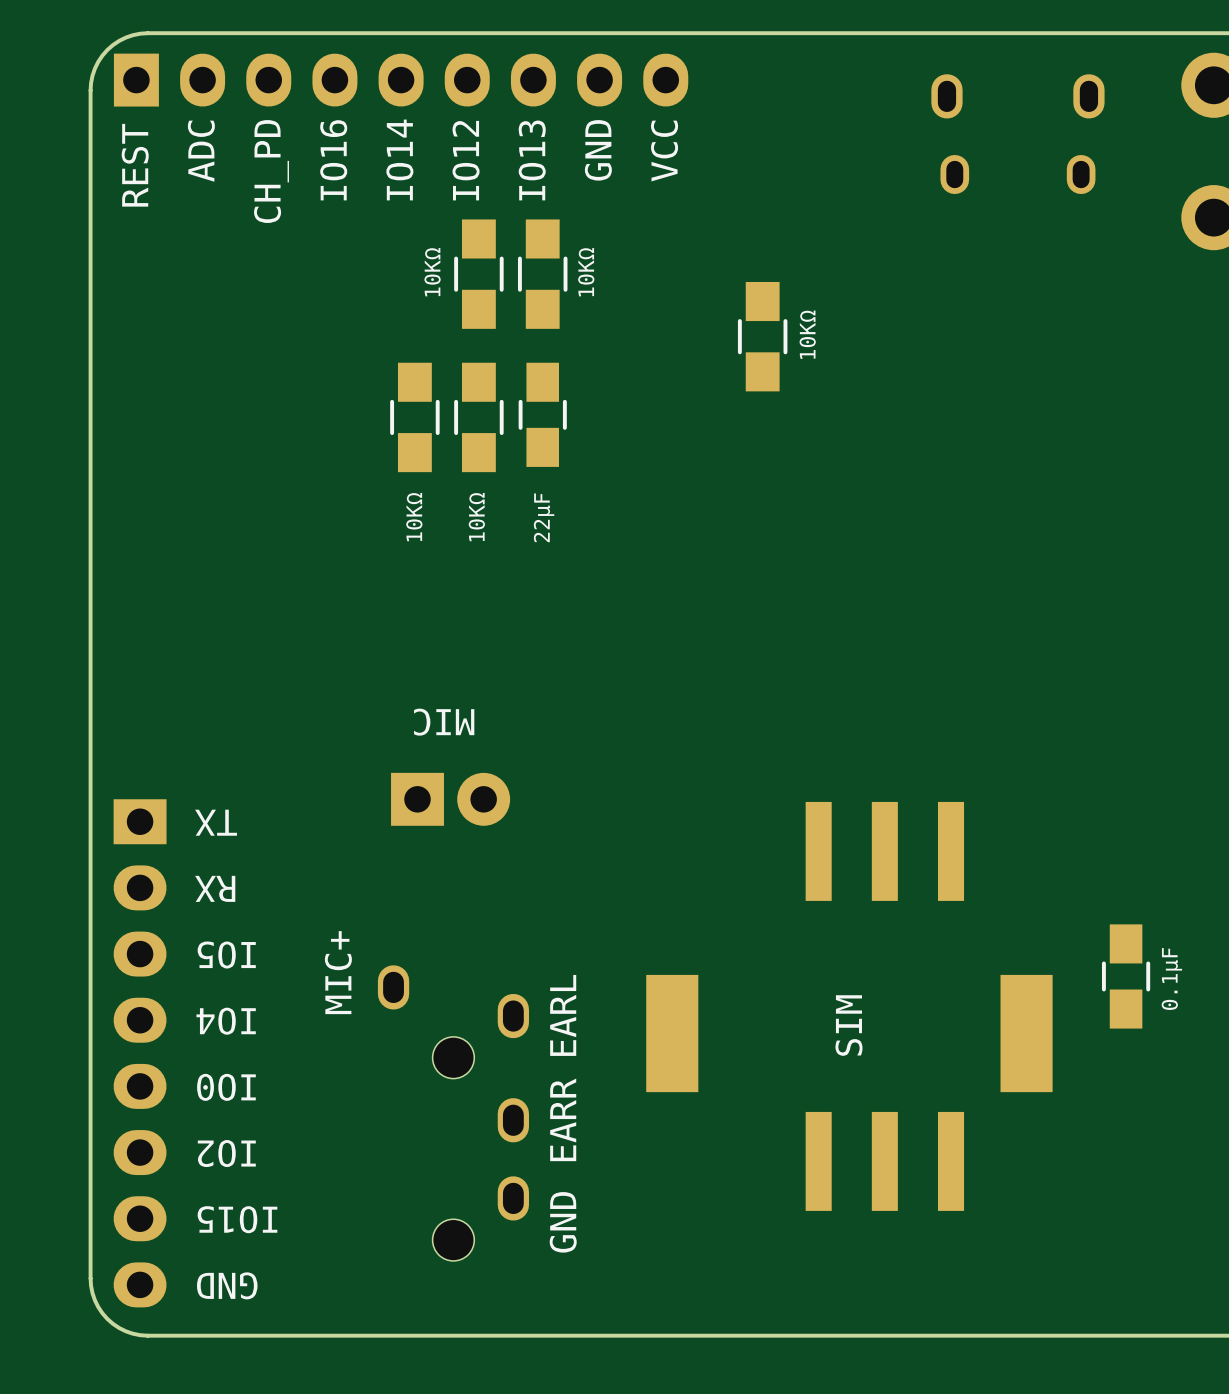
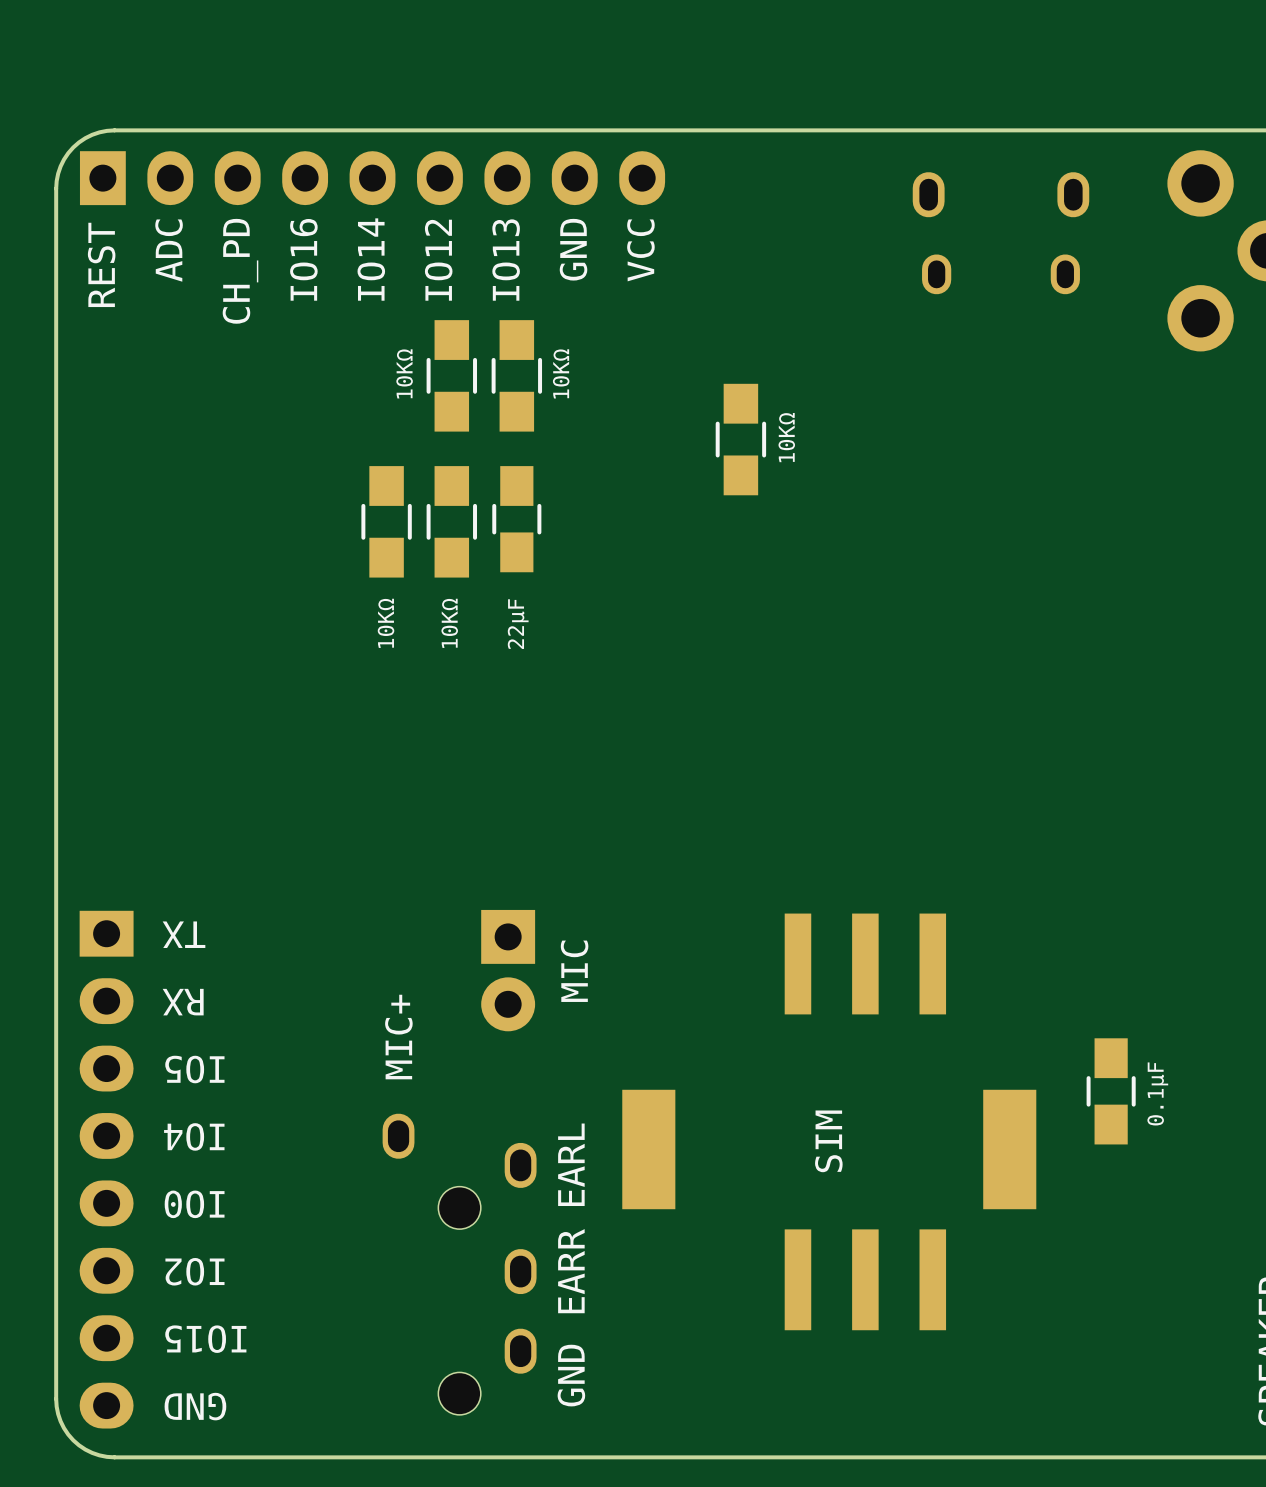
text rotation: 0° (444, 722) -> 90° clockwise (574, 971)
text position: MIC (444, 722) -> MIC (574, 971)
part rotation: 0° (450, 799) -> 90° clockwise (508, 970)
part position: (450, 799) -> (508, 970)
text position: MIC+ (338, 972) -> MIC+ (398, 1037)
text position: EARL (563, 1015) -> EARL (571, 1164)
part position: (453, 1113) -> (459, 1264)
text position: EARR (563, 1119) -> EARR (571, 1271)
text position: GND (563, 1222) -> GND (571, 1375)

